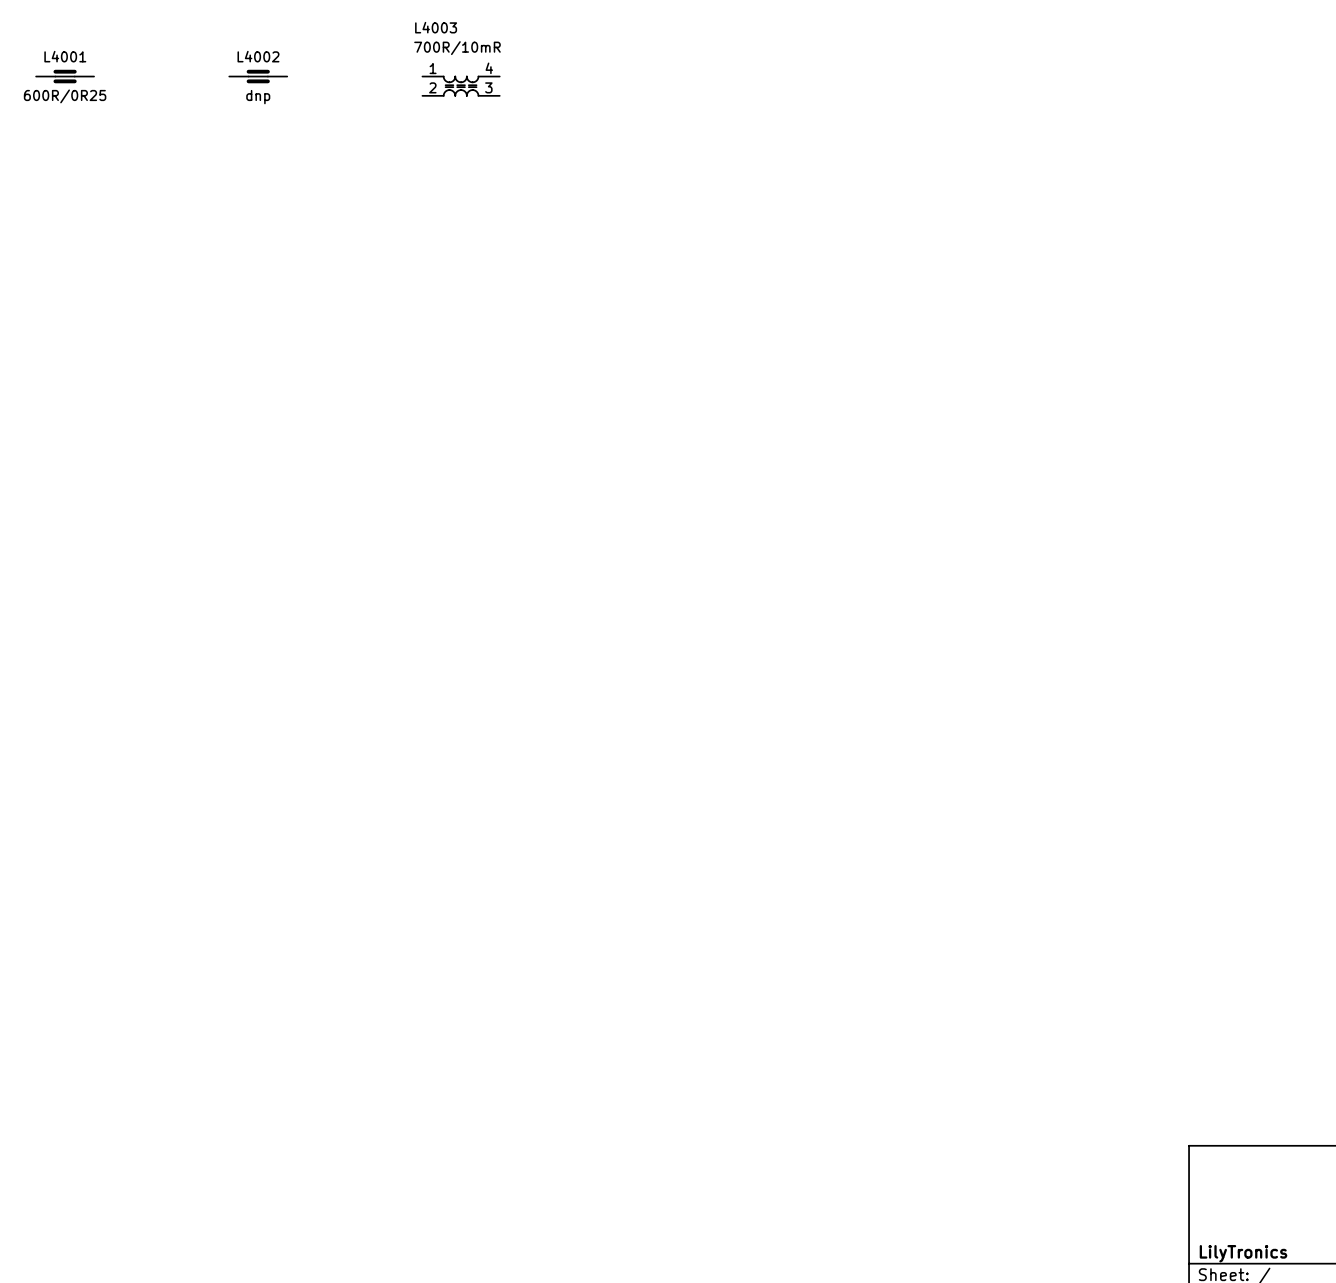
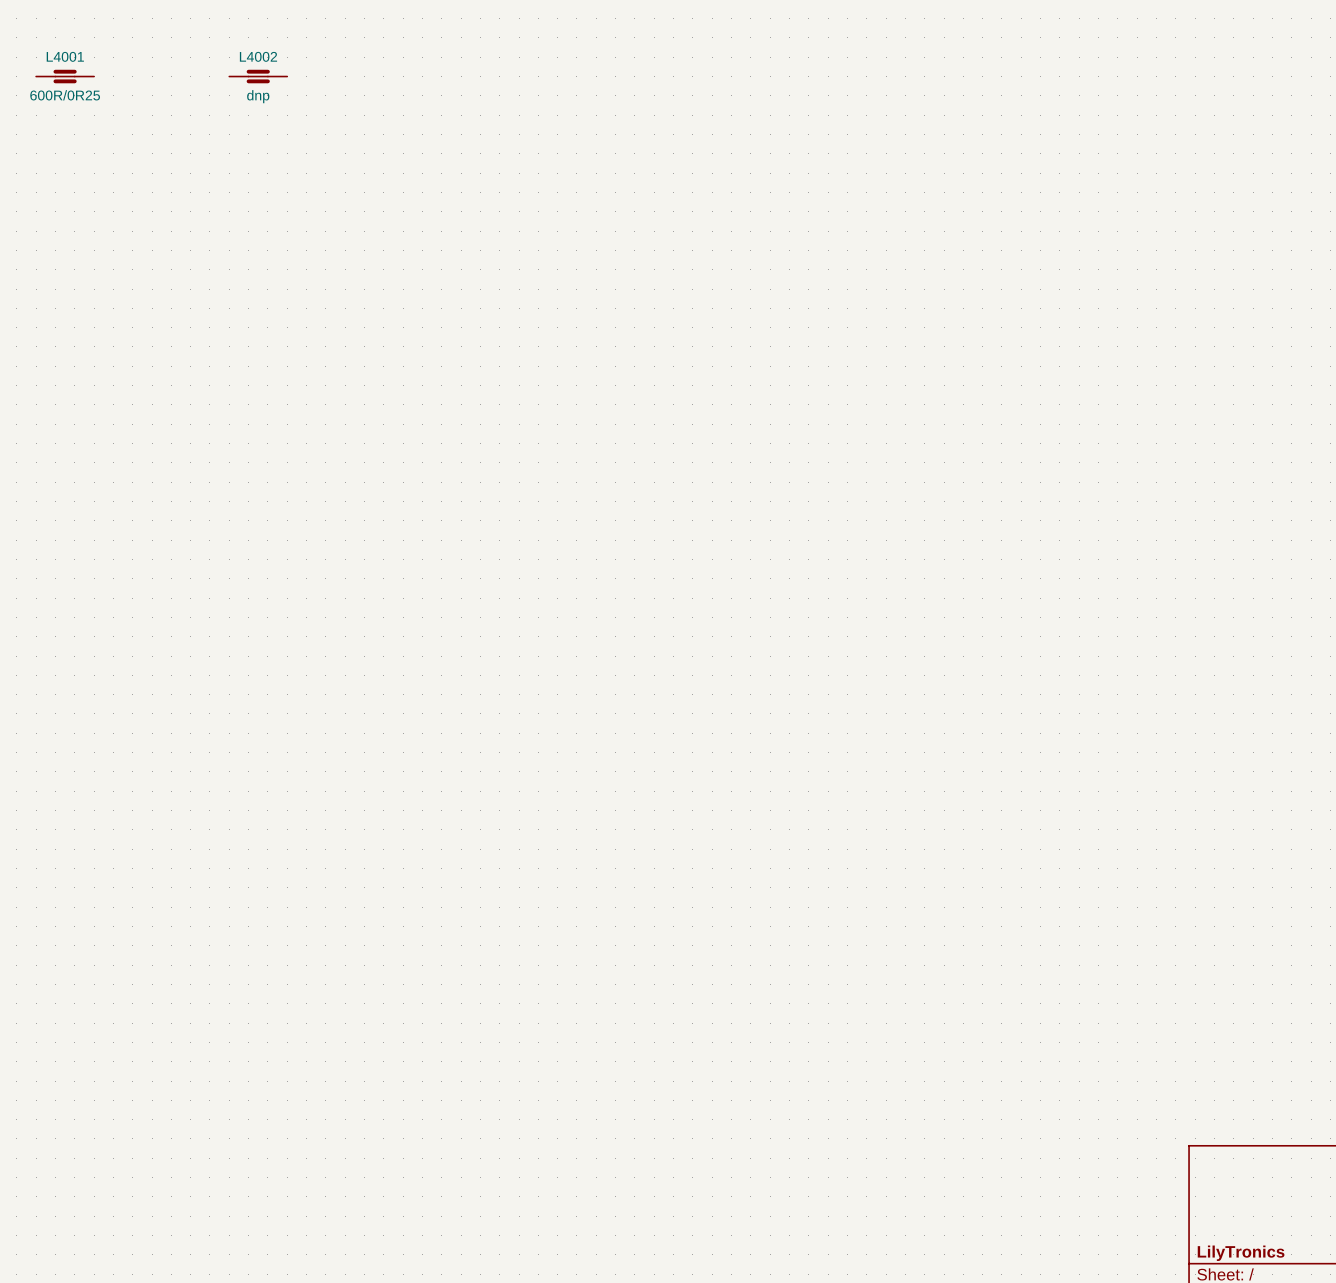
L4003: 700R/10mR (461, 86) -> none

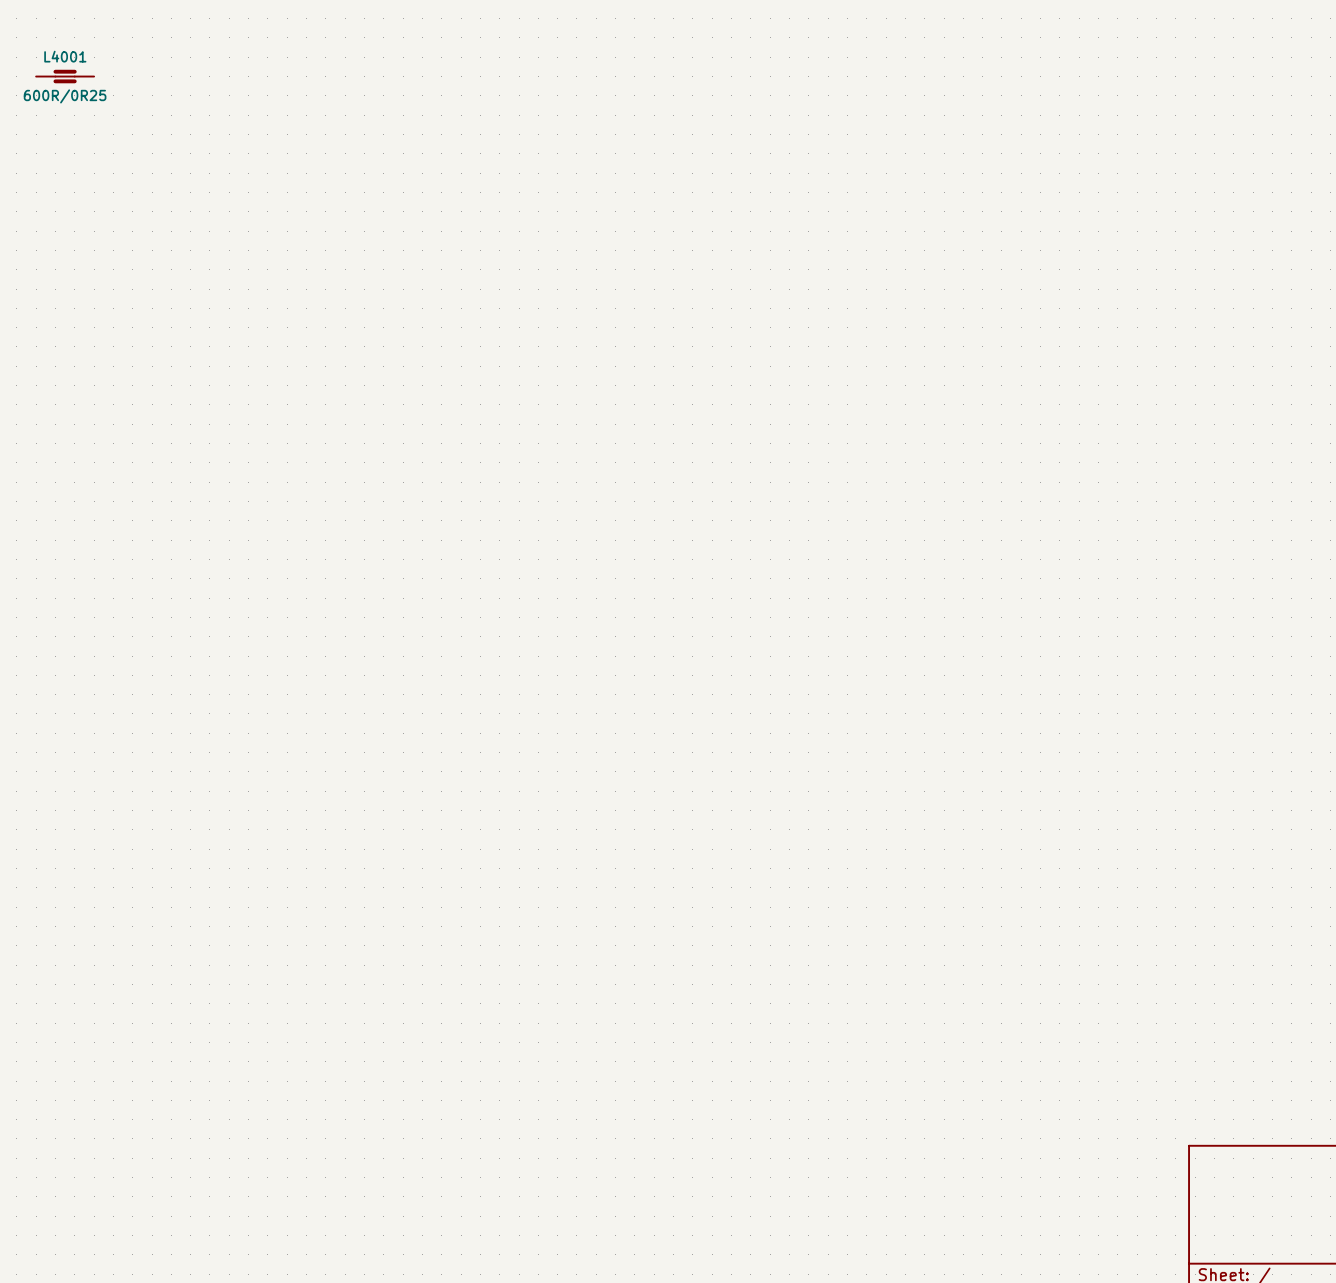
L4002: dnp (258, 76) -> none
title block: LilyTronics (1241, 1253) -> none

